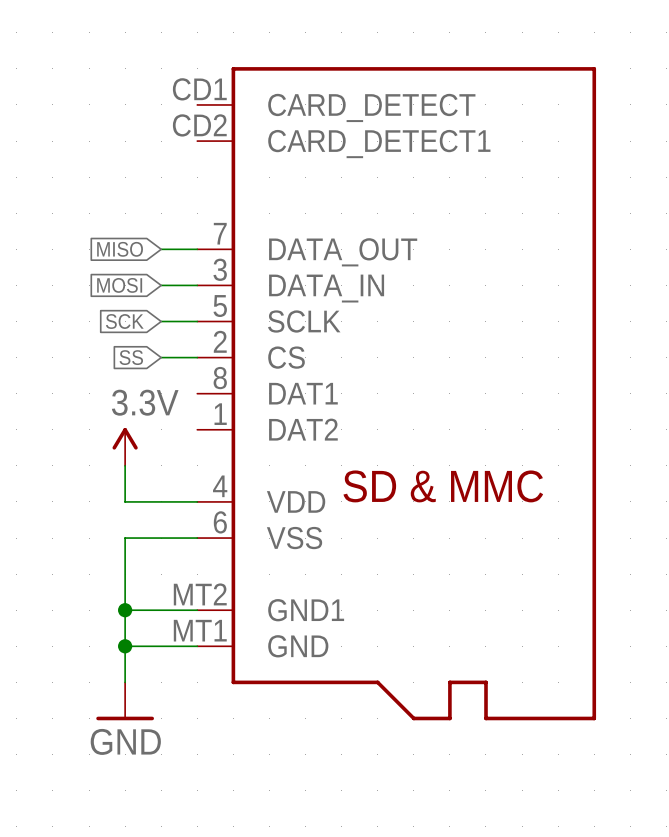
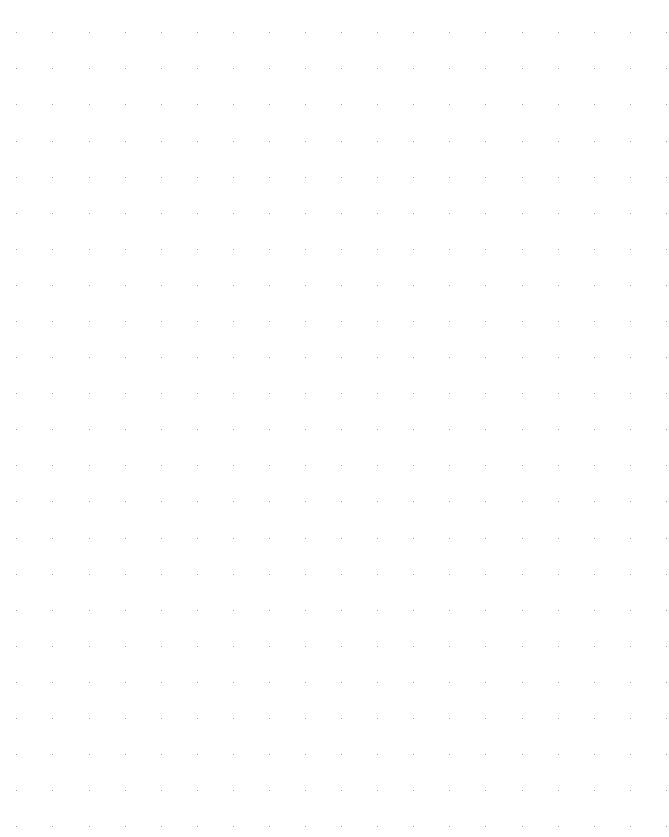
global label: MISO (120, 249) -> none
wire: (161, 249) (197, 249) -> none
global label: MOSI (119, 285) -> none
wire: (161, 285) (197, 285) -> none
global label: SCK (124, 321) -> none
wire: (161, 321) (197, 321) -> none
global label: SS (131, 357) -> none
wire: (161, 357) (197, 357) -> none
part: (396, 393) -> none
power symbol: 3.3V (125, 446) -> none
wire: (125, 465) (125, 501) (197, 501) -> none
wire: (197, 538) (125, 538) (125, 682) -> none
wire: (125, 610) (197, 610) -> none
junction: (125, 610) -> none
wire: (125, 646) (197, 646) -> none
junction: (125, 646) -> none
power symbol: GND (125, 701) -> none

